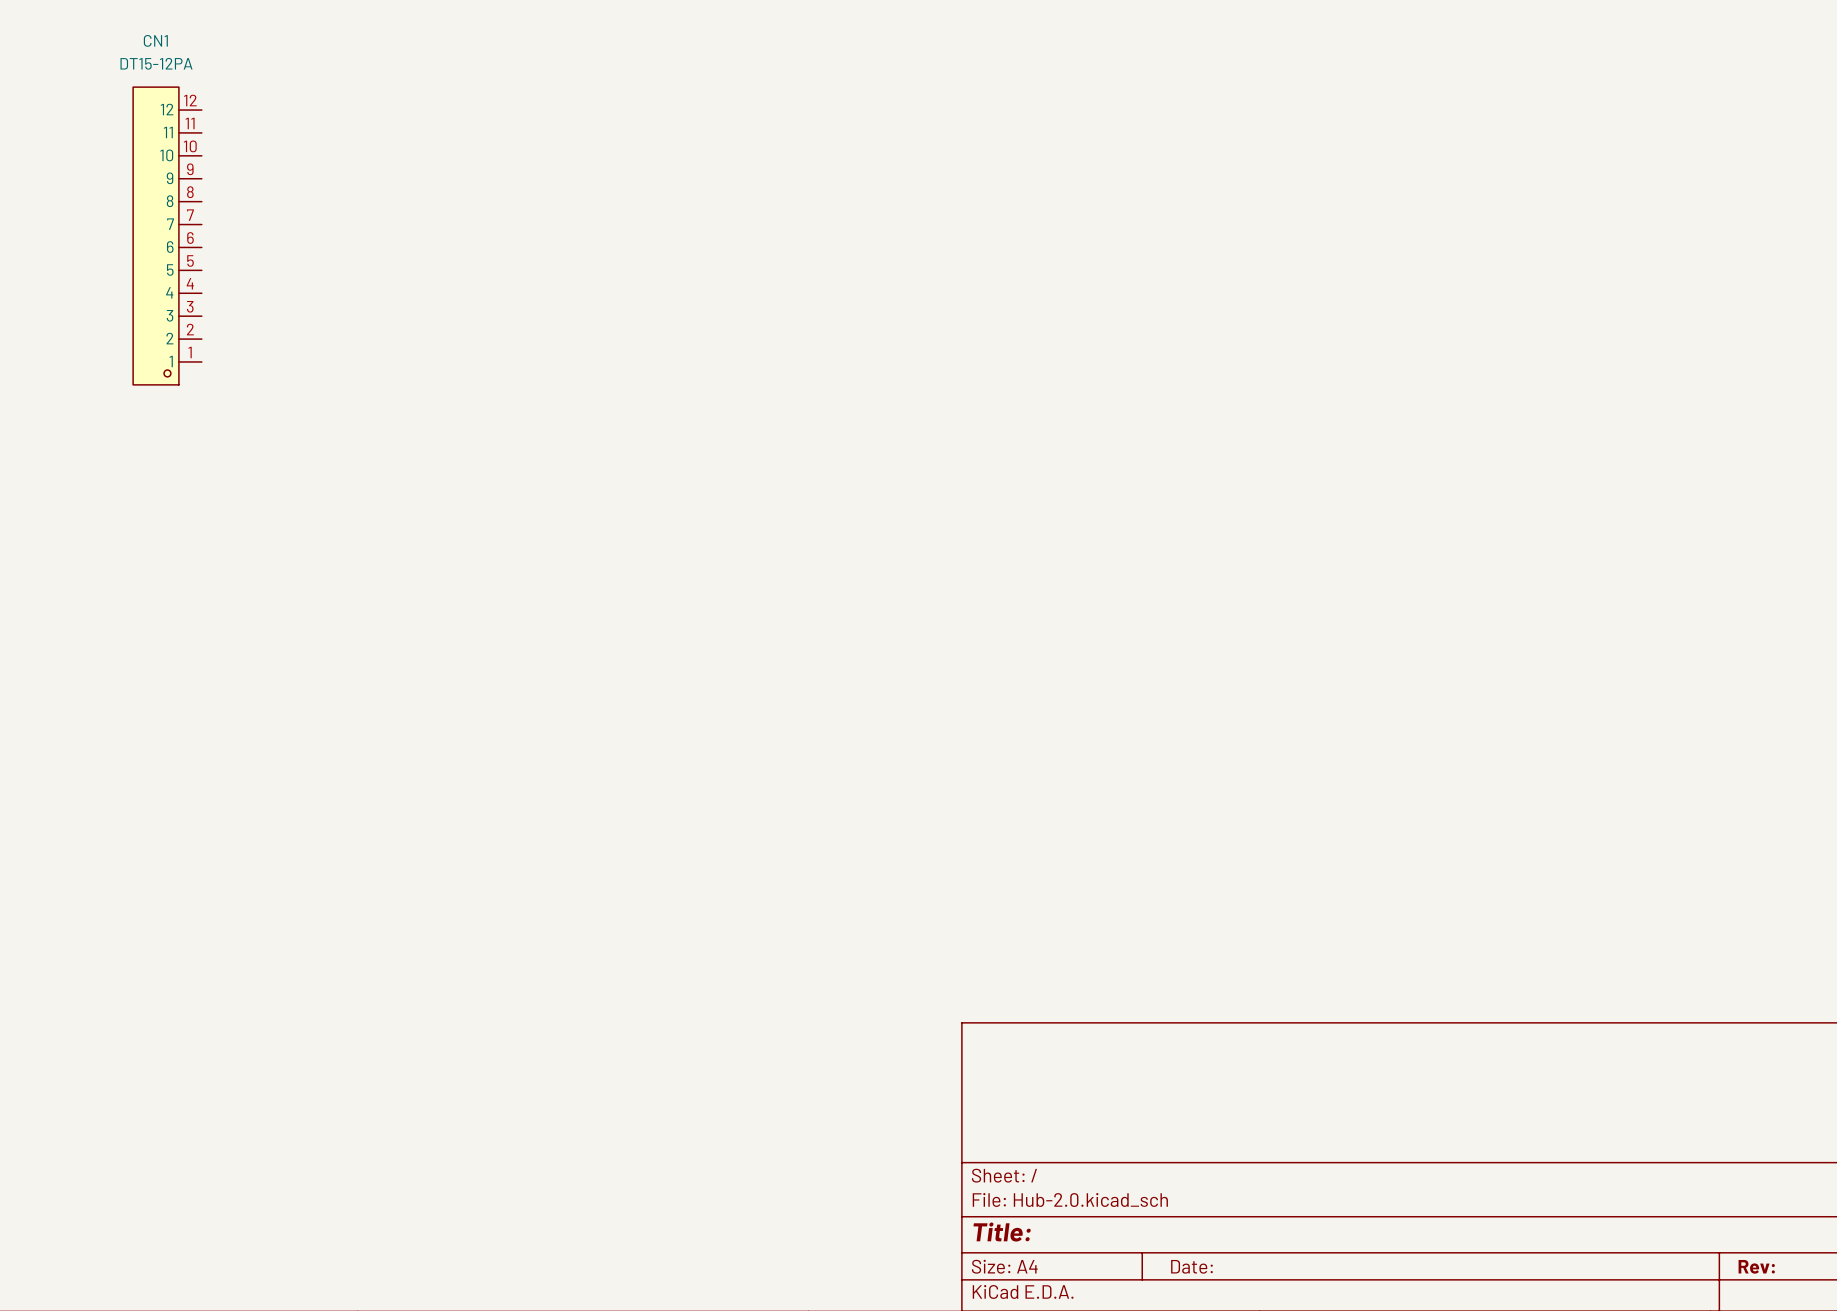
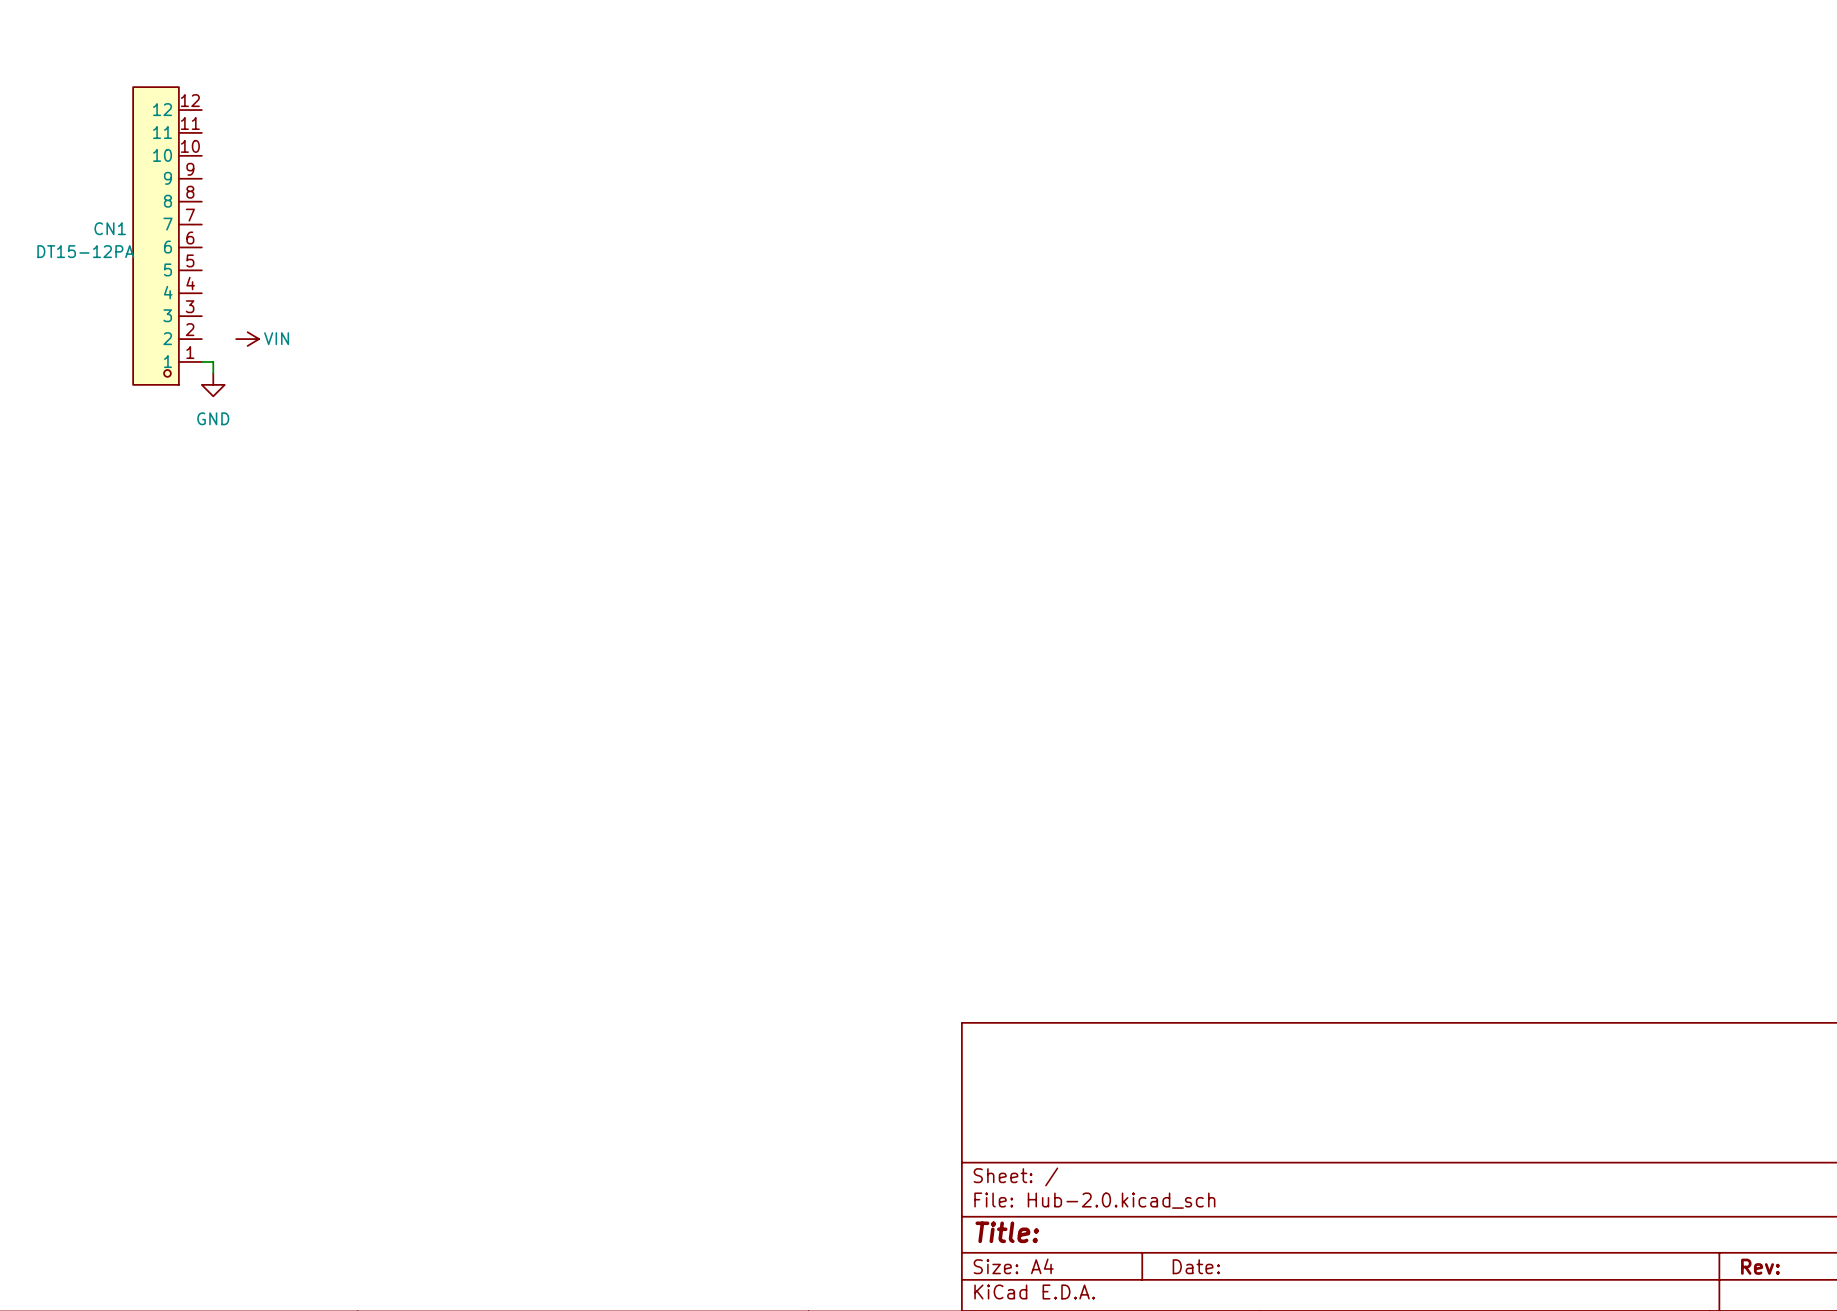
CN1 name position: CN1 (155, 40) -> CN1 (110, 228)
CN1 value position: DT15-12PA (156, 63) -> DT15-12PA (85, 251)
power symbol: none -> VIN (247, 339)
wire: none -> (201, 361) (213, 361) (213, 373)
power symbol: none -> GND (213, 384)

